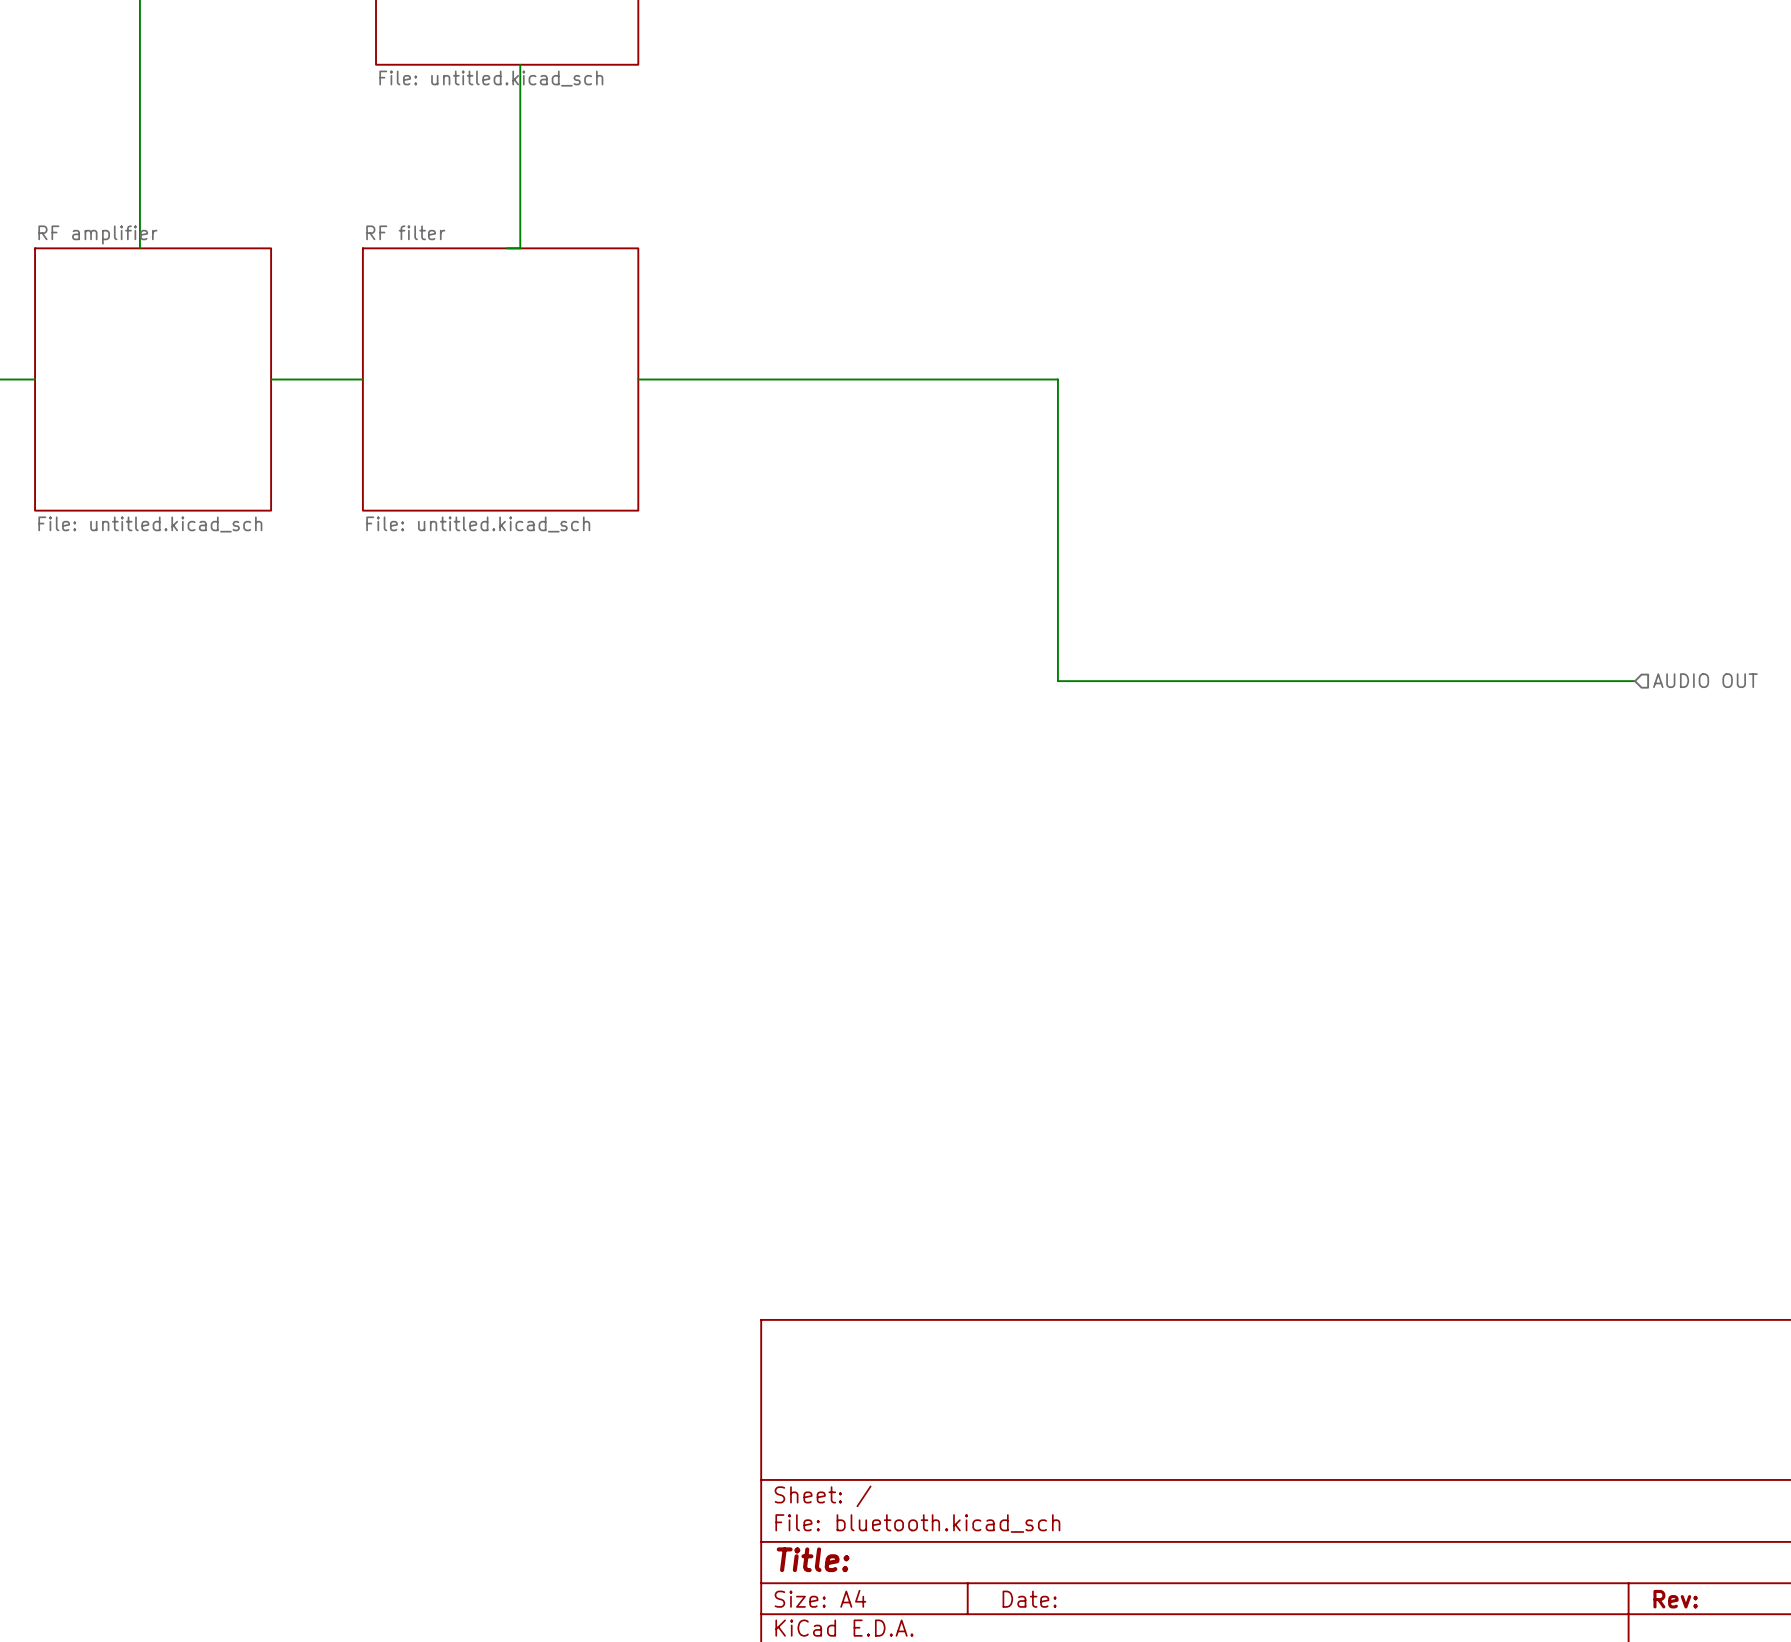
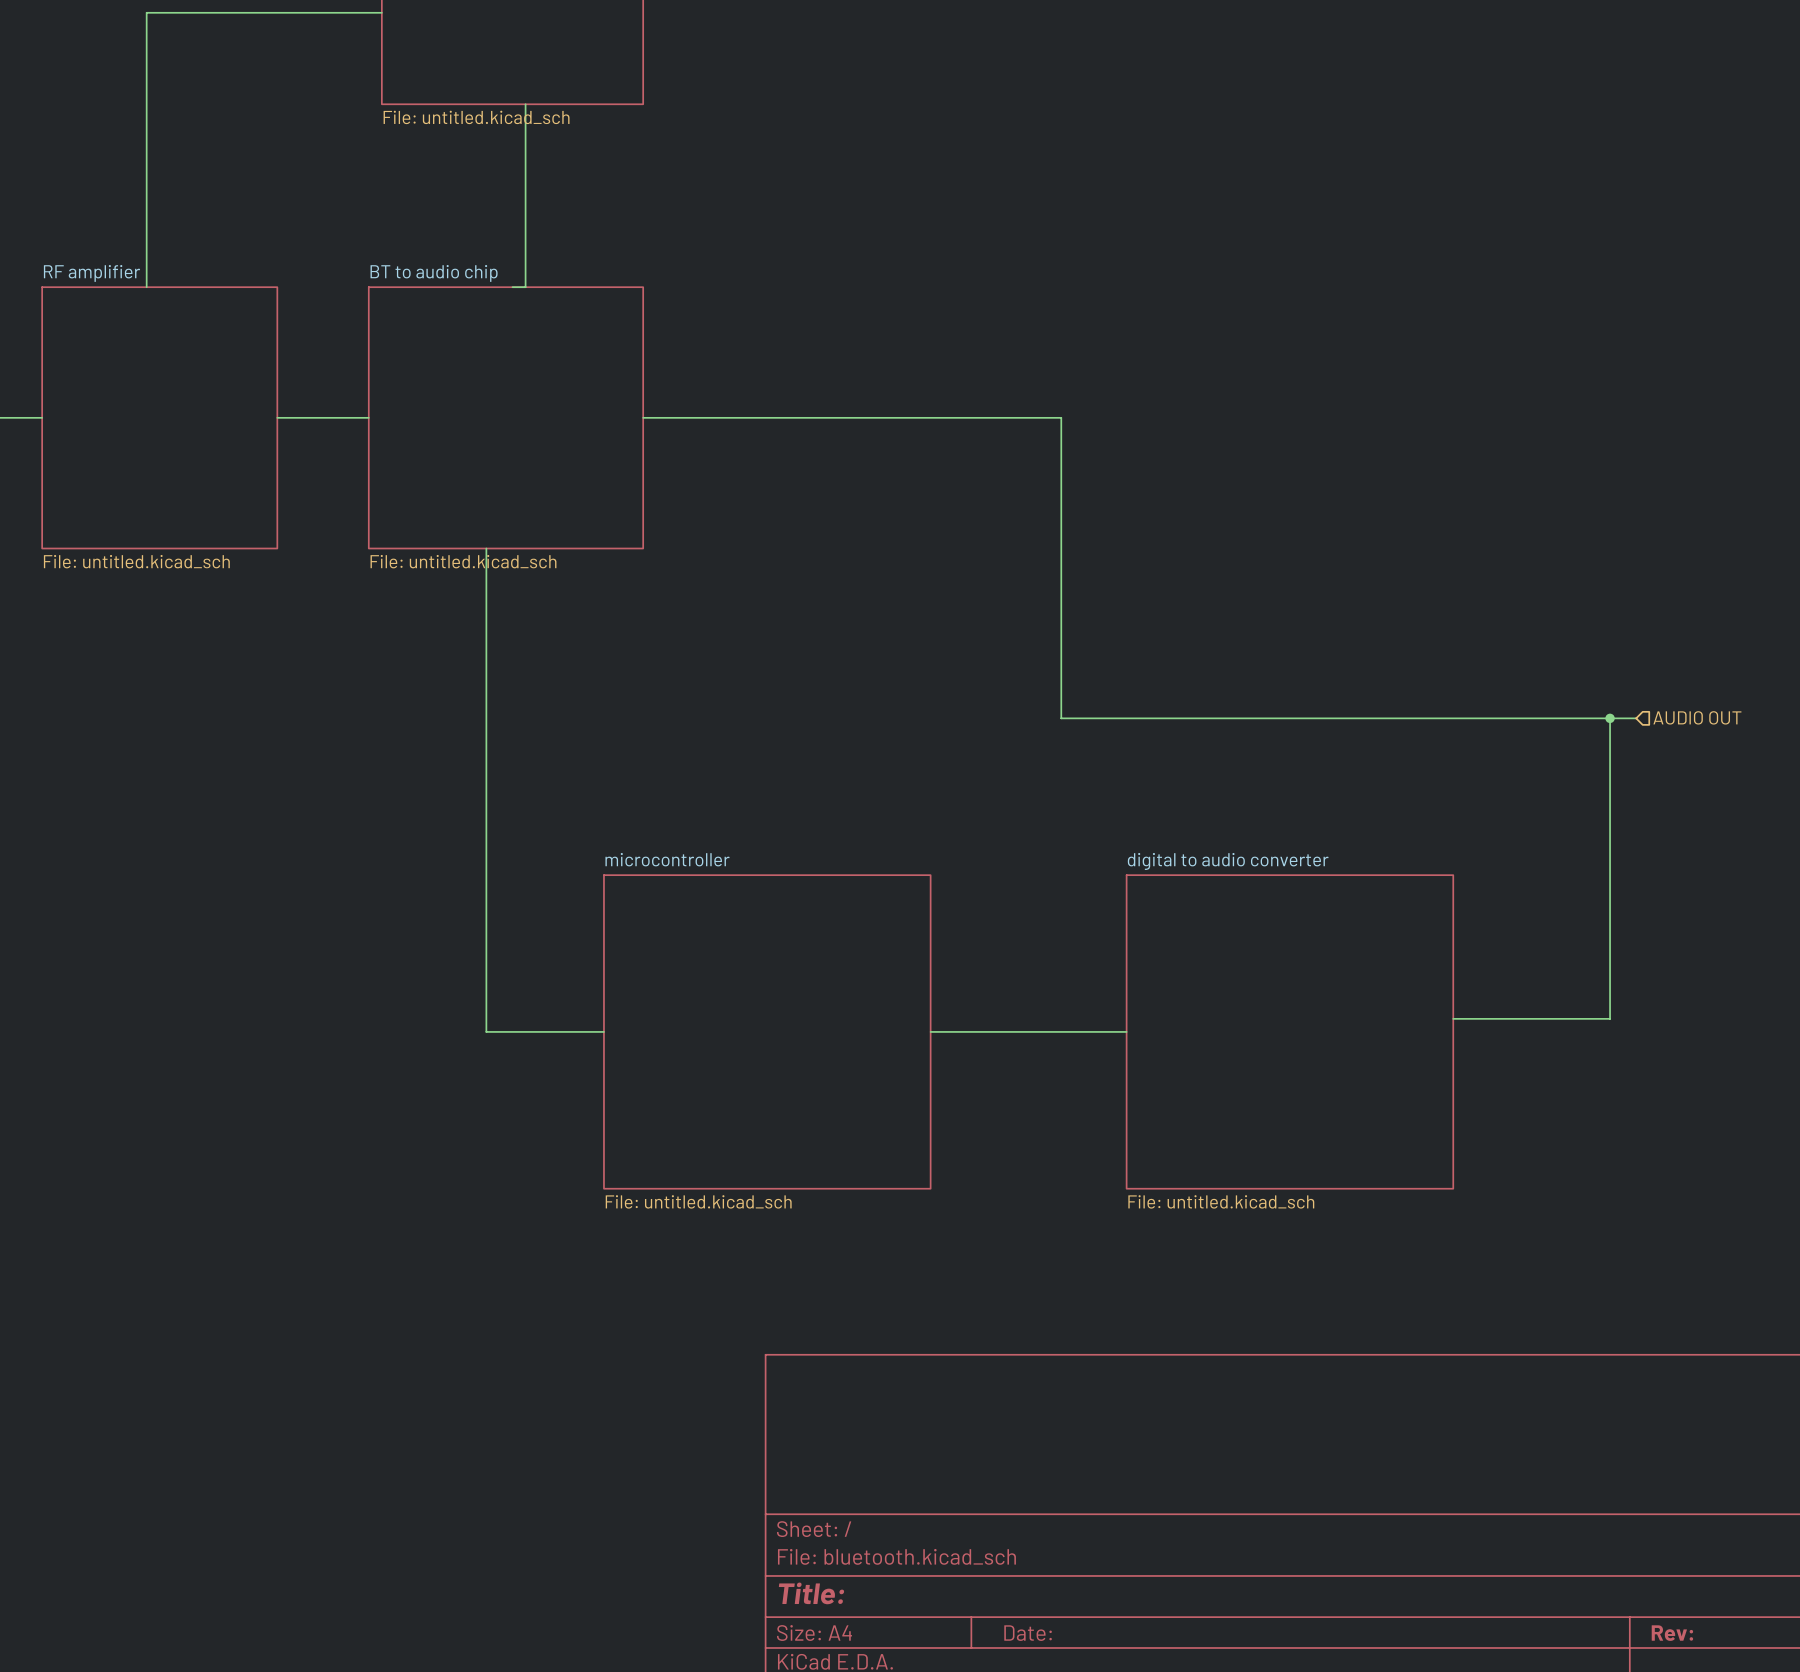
sheet RF filter name: RF filter (405, 232) -> BT to audio chip (434, 273)
wire: none -> (486, 548) (486, 1031) (603, 1031)
wire: none -> (1610, 718) (1610, 1018) (1453, 1018)
junction: none -> (1610, 718)
sheet microcontroller: none -> File: untitled.kicad_sch (767, 1031)
wire: none -> (930, 1031) (1126, 1031)
sheet digital to audio converter: none -> File: untitled.kicad_sch (1289, 1031)

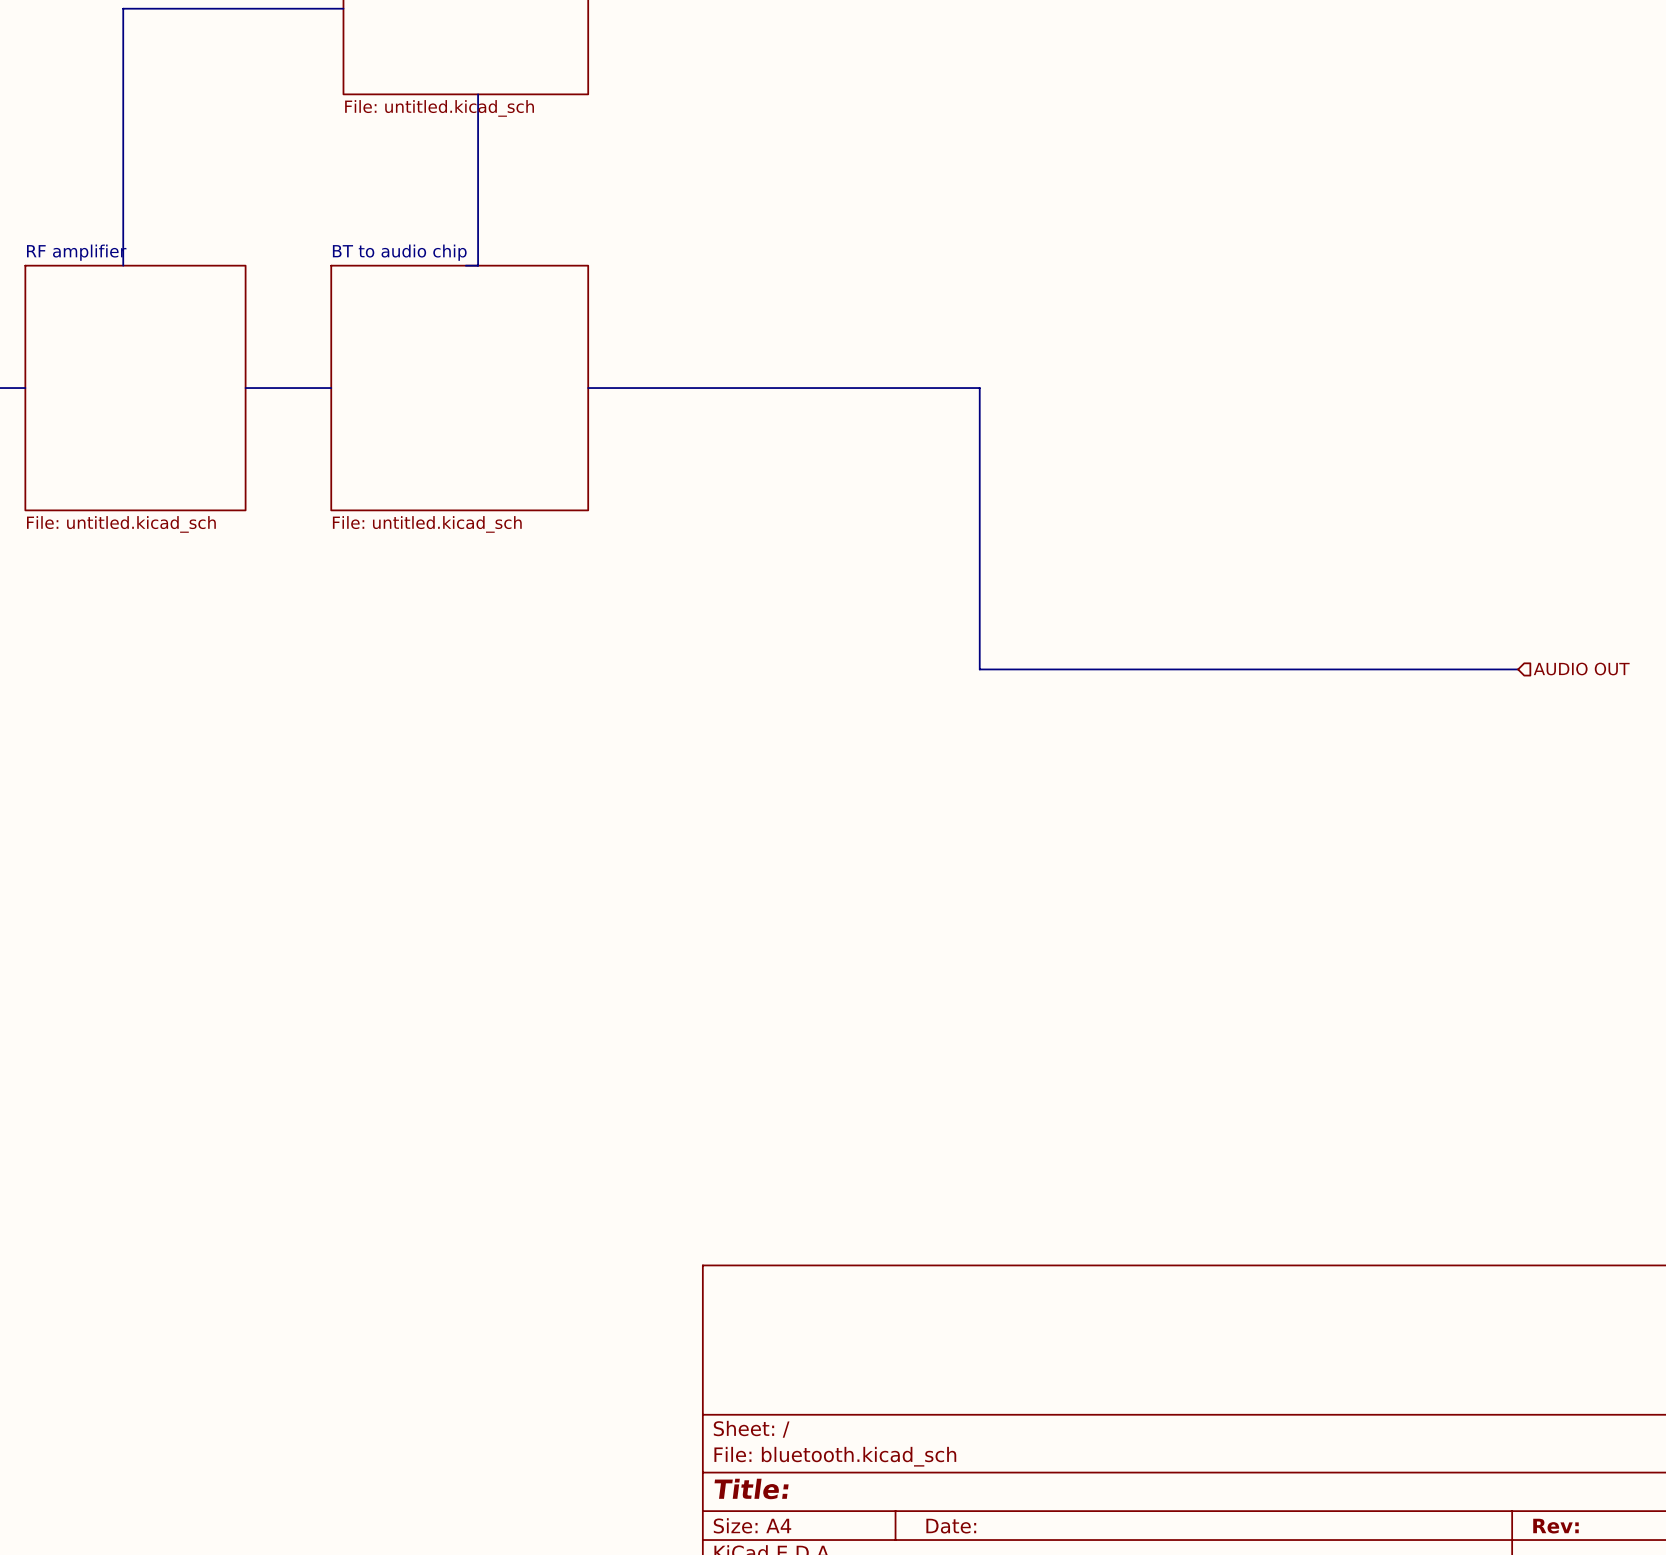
wire: (486, 548) (486, 1031) (603, 1031) -> none
wire: (1610, 718) (1610, 1018) (1453, 1018) -> none
junction: (1610, 718) -> none
sheet microcontroller: File: untitled.kicad_sch (767, 1031) -> none
wire: (930, 1031) (1126, 1031) -> none
sheet digital to audio converter: File: untitled.kicad_sch (1289, 1031) -> none

